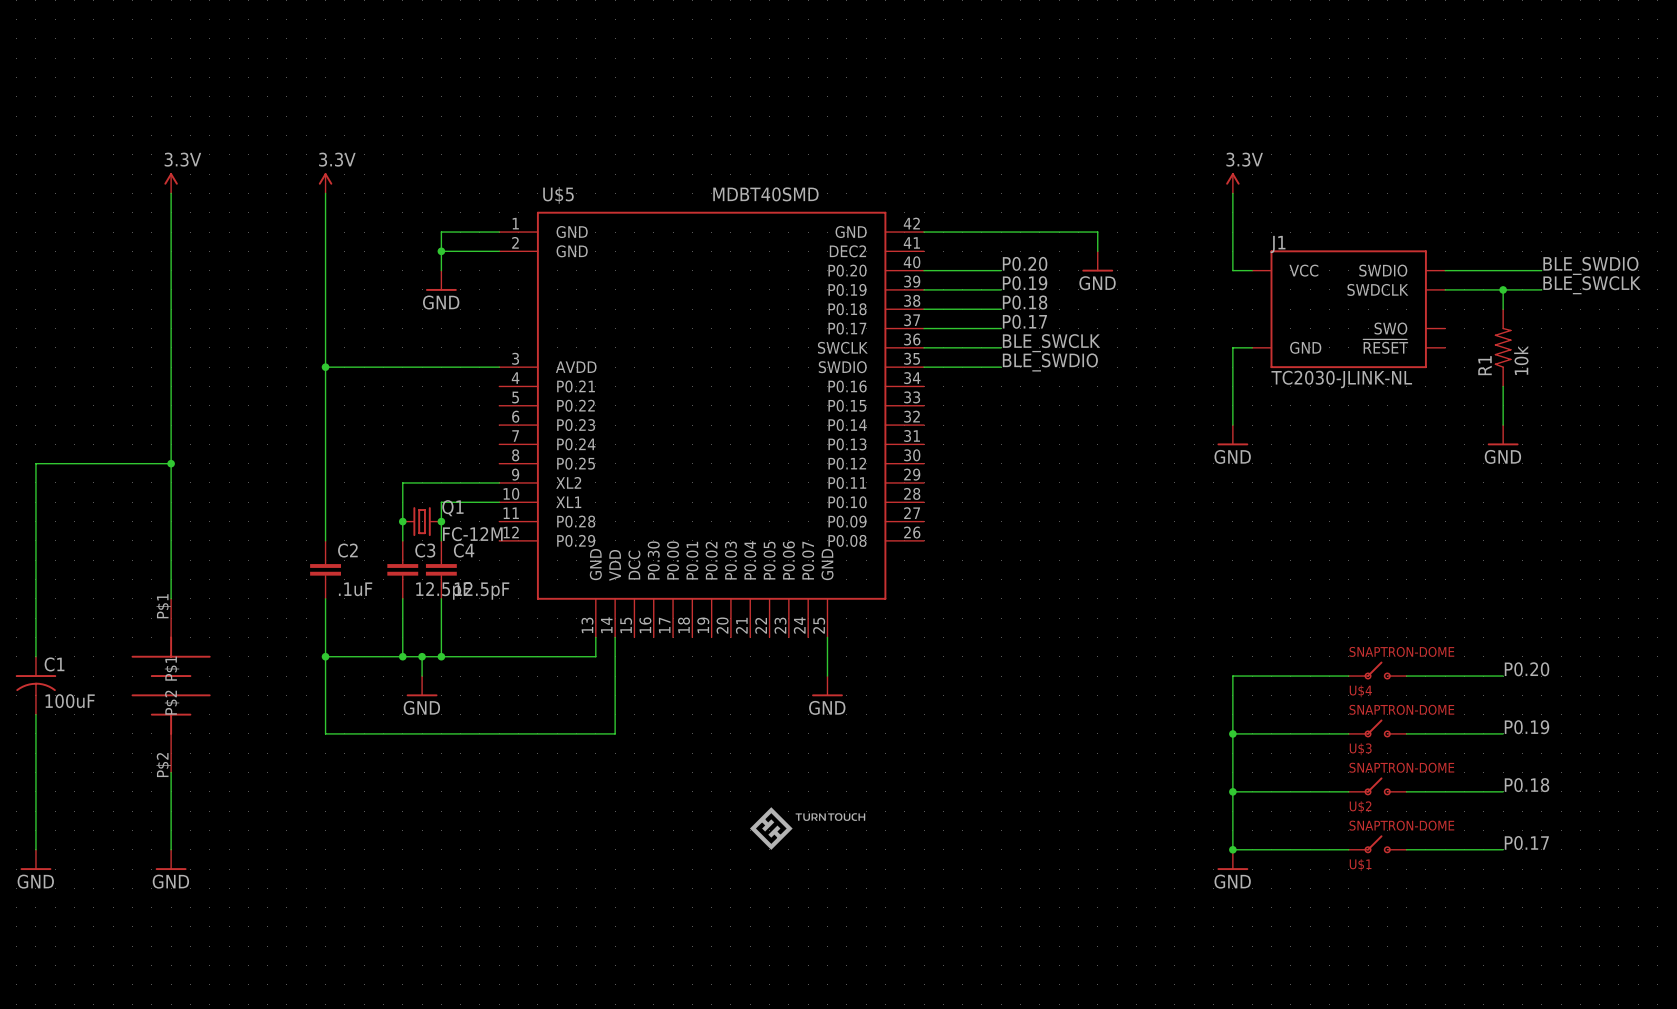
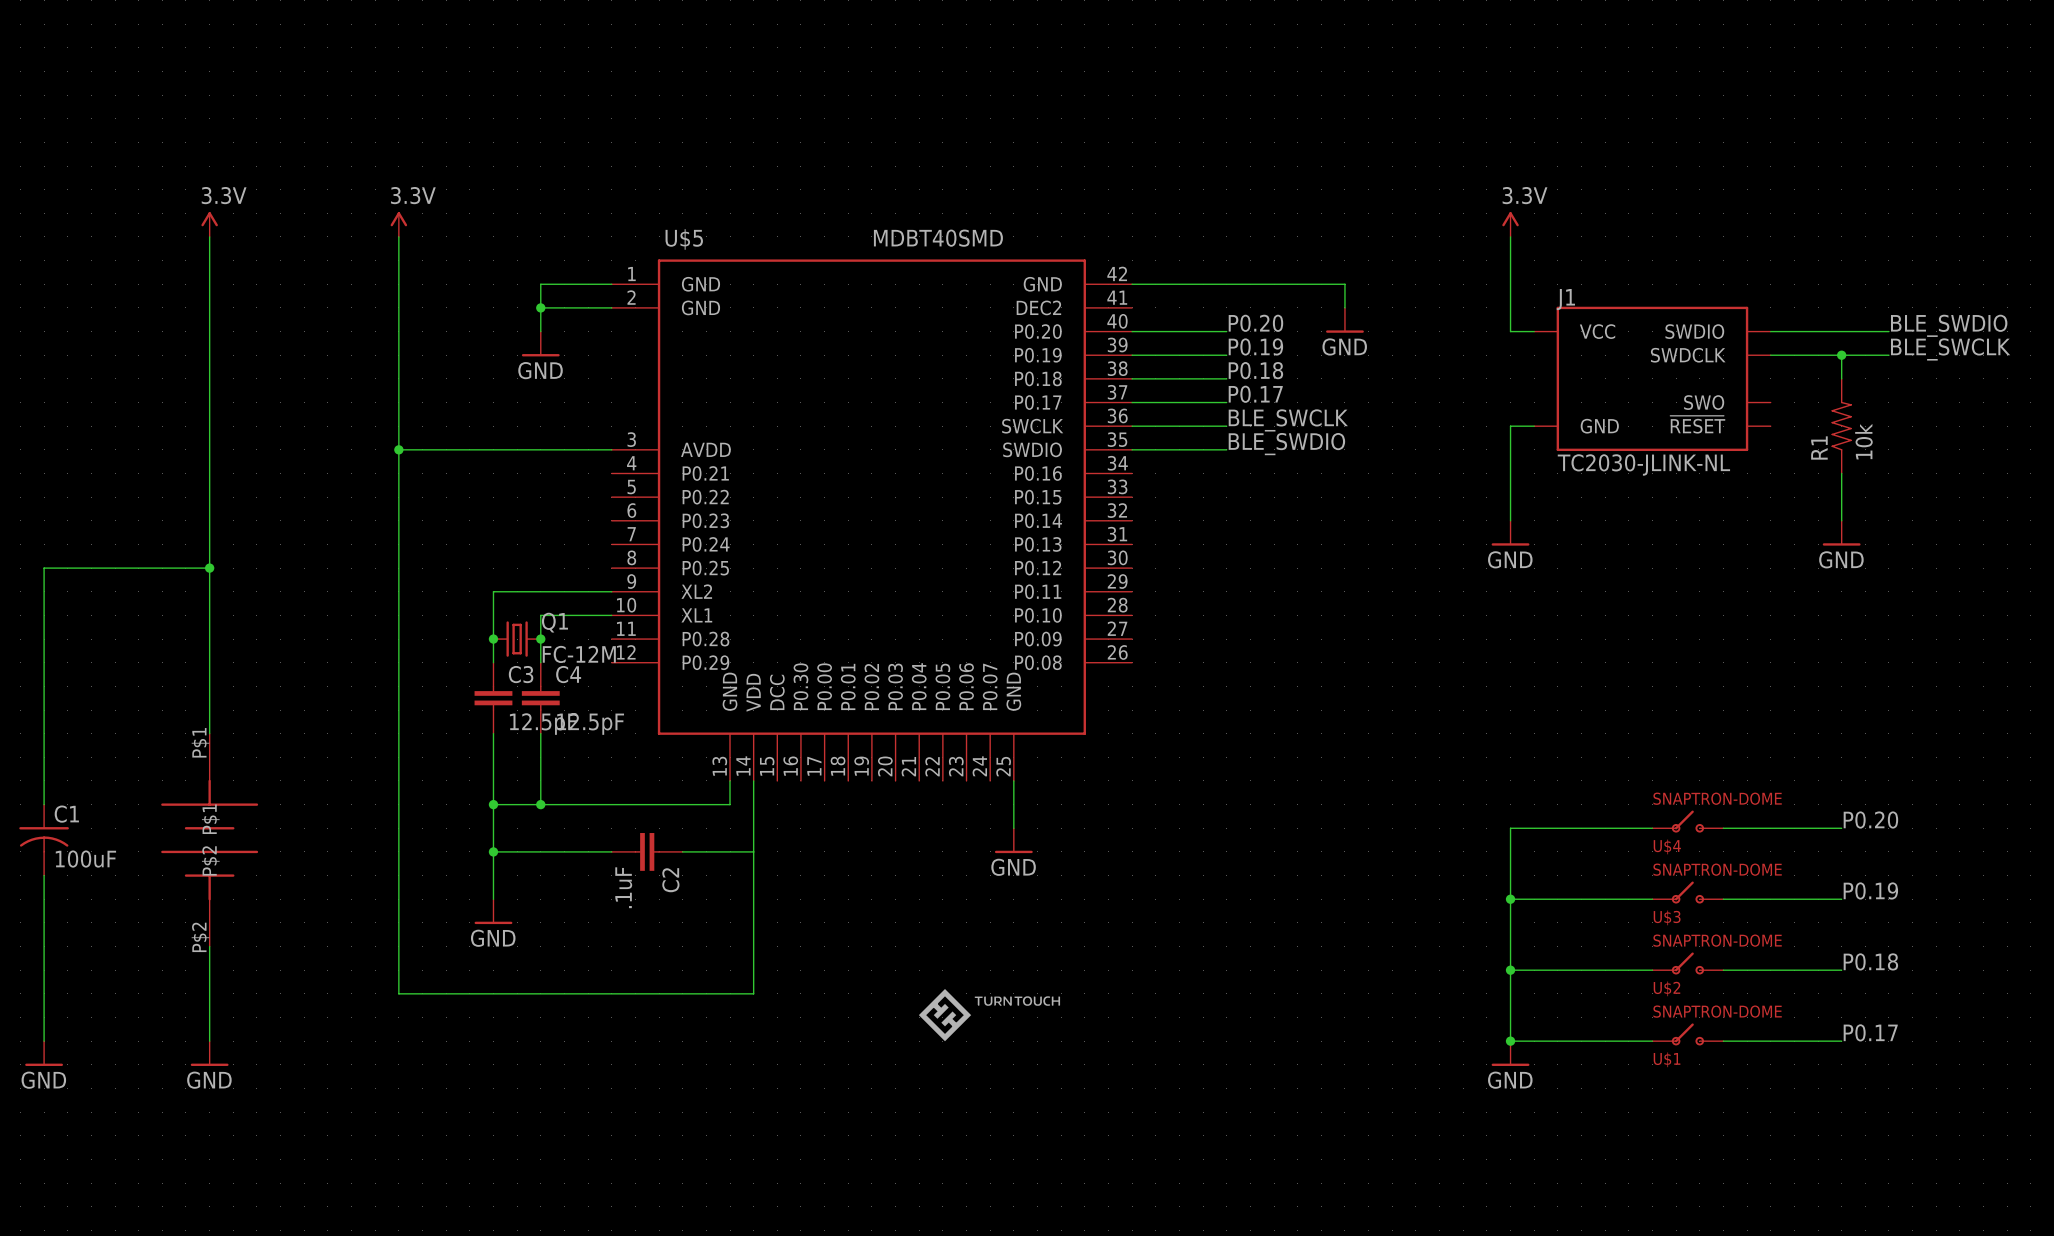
C2 rotation: 0° (325, 569) -> 90° clockwise (647, 851)
C2 position: (325, 569) -> (647, 851)
wire: (325, 656) (402, 656) -> (493, 899) (493, 804)
junction: (325, 656) -> none
wire: (422, 656) (422, 676) -> none
junction: (422, 656) -> none
power symbol position: GND (422, 686) -> GND (493, 911)
wire: none -> (493, 851) (611, 851)
junction: none -> (493, 851)
wire: none -> (682, 851) (753, 851)
wire: (325, 733) (615, 733) -> (398, 899) (398, 993) (753, 993) (753, 899)

